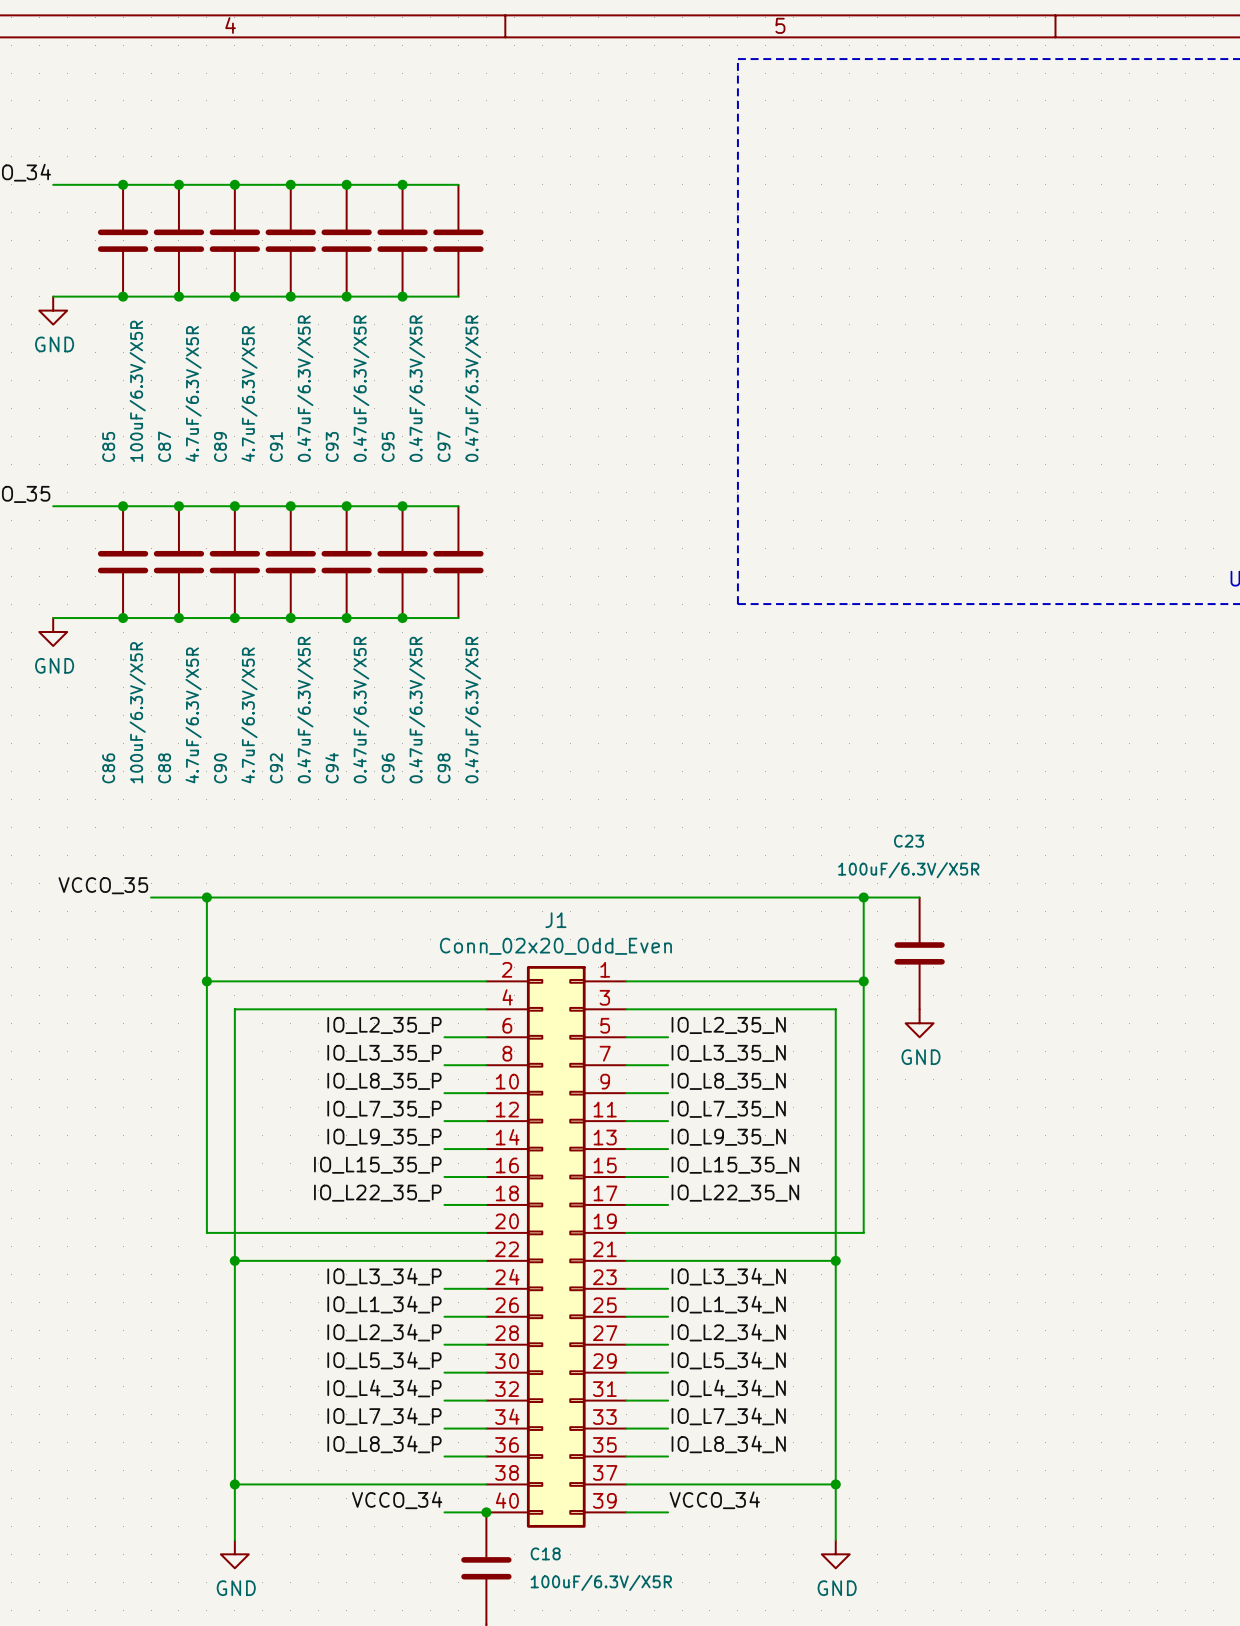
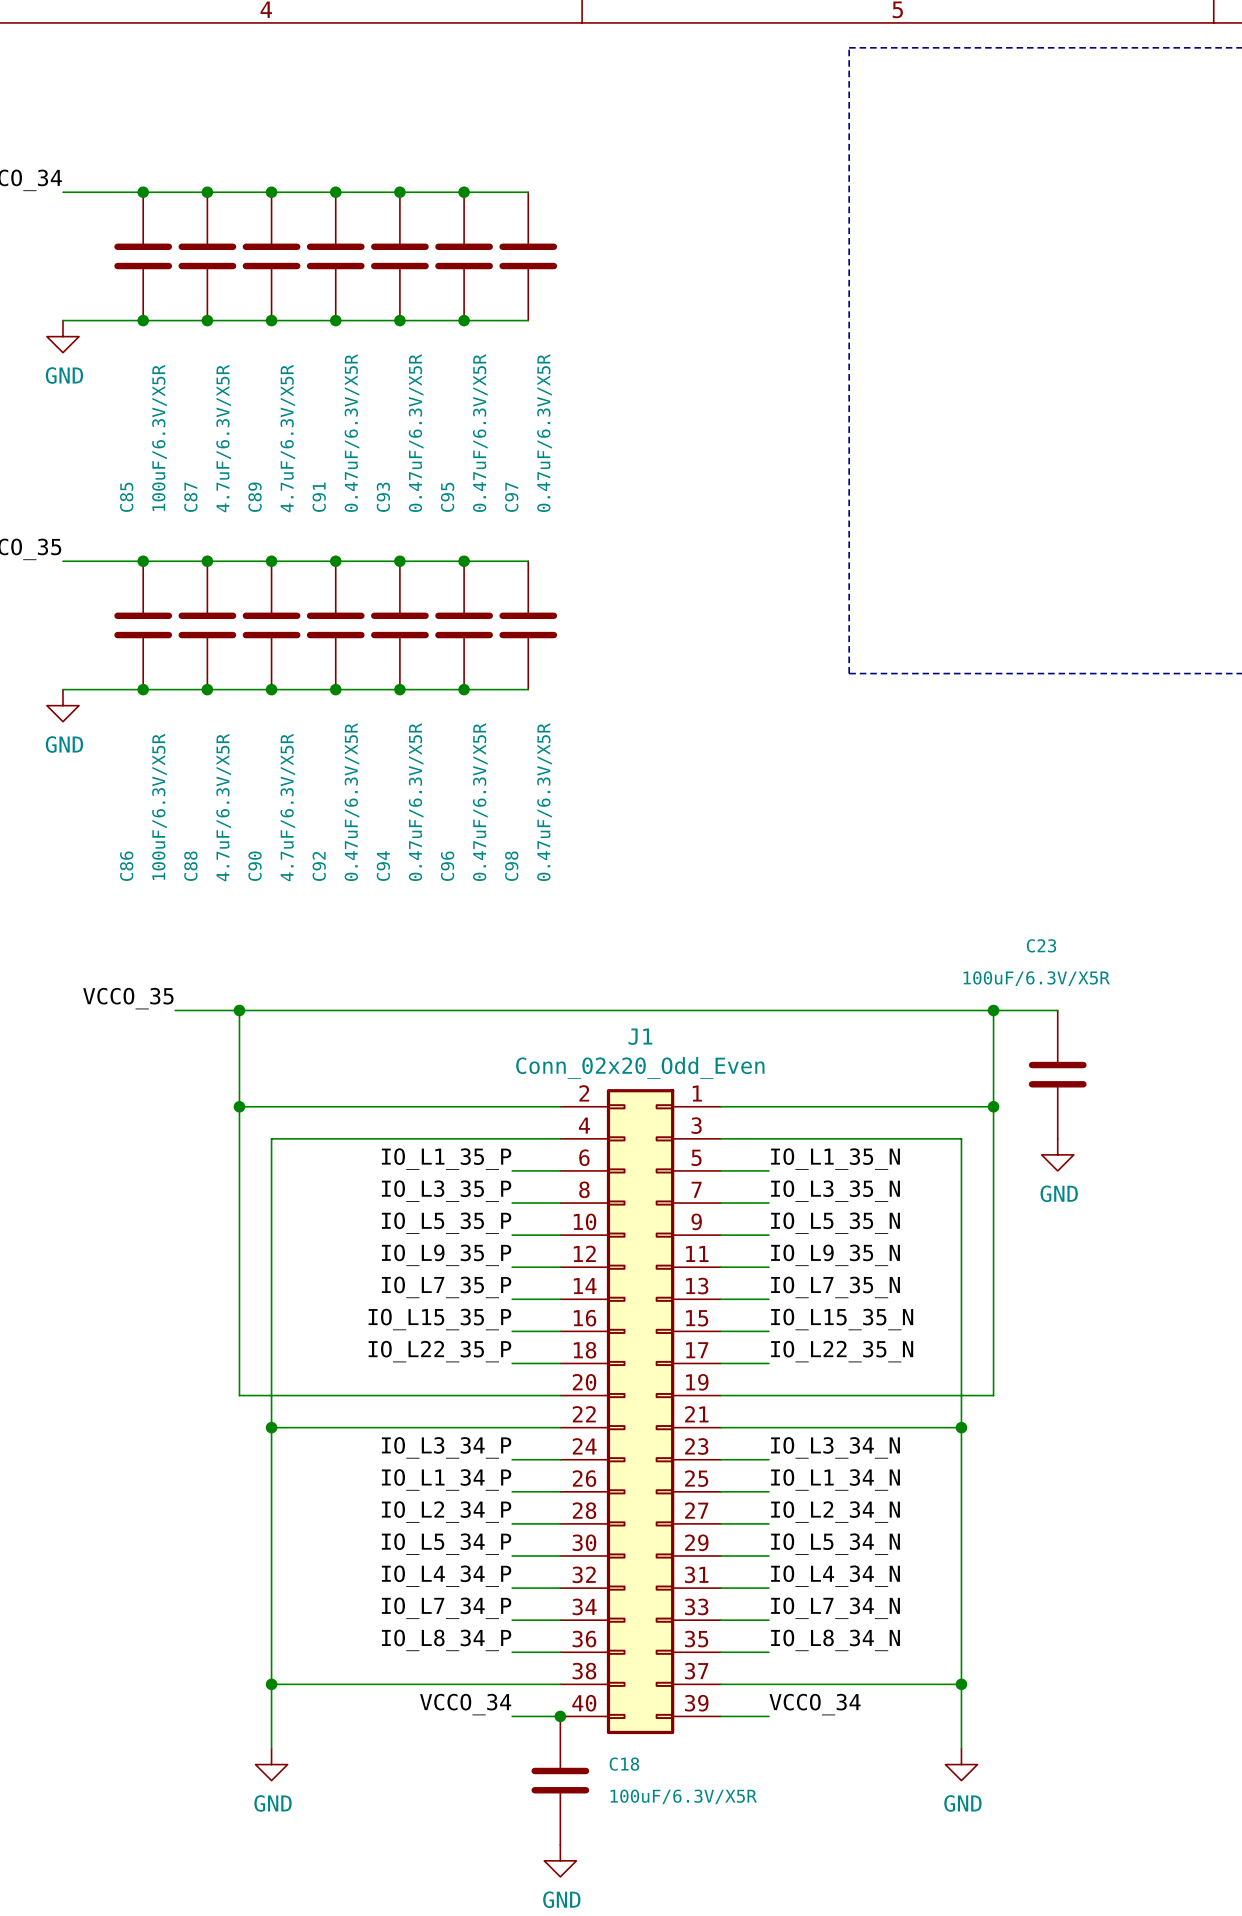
label: IO_L2_35_P (384, 1025) -> IO_L1_35_P (446, 1159)
label: IO_L2_35_N (728, 1025) -> IO_L1_35_N (835, 1159)
label: IO_L8_35_P (384, 1081) -> IO_L5_35_P (446, 1223)
label: IO_L8_35_N (728, 1081) -> IO_L5_35_N (835, 1223)
label: IO_L7_35_P (384, 1109) -> IO_L9_35_P (446, 1255)
label: IO_L7_35_N (728, 1109) -> IO_L9_35_N (835, 1255)
label: IO_L9_35_P (384, 1137) -> IO_L7_35_P (446, 1287)
label: IO_L9_35_N (728, 1137) -> IO_L7_35_N (835, 1287)

